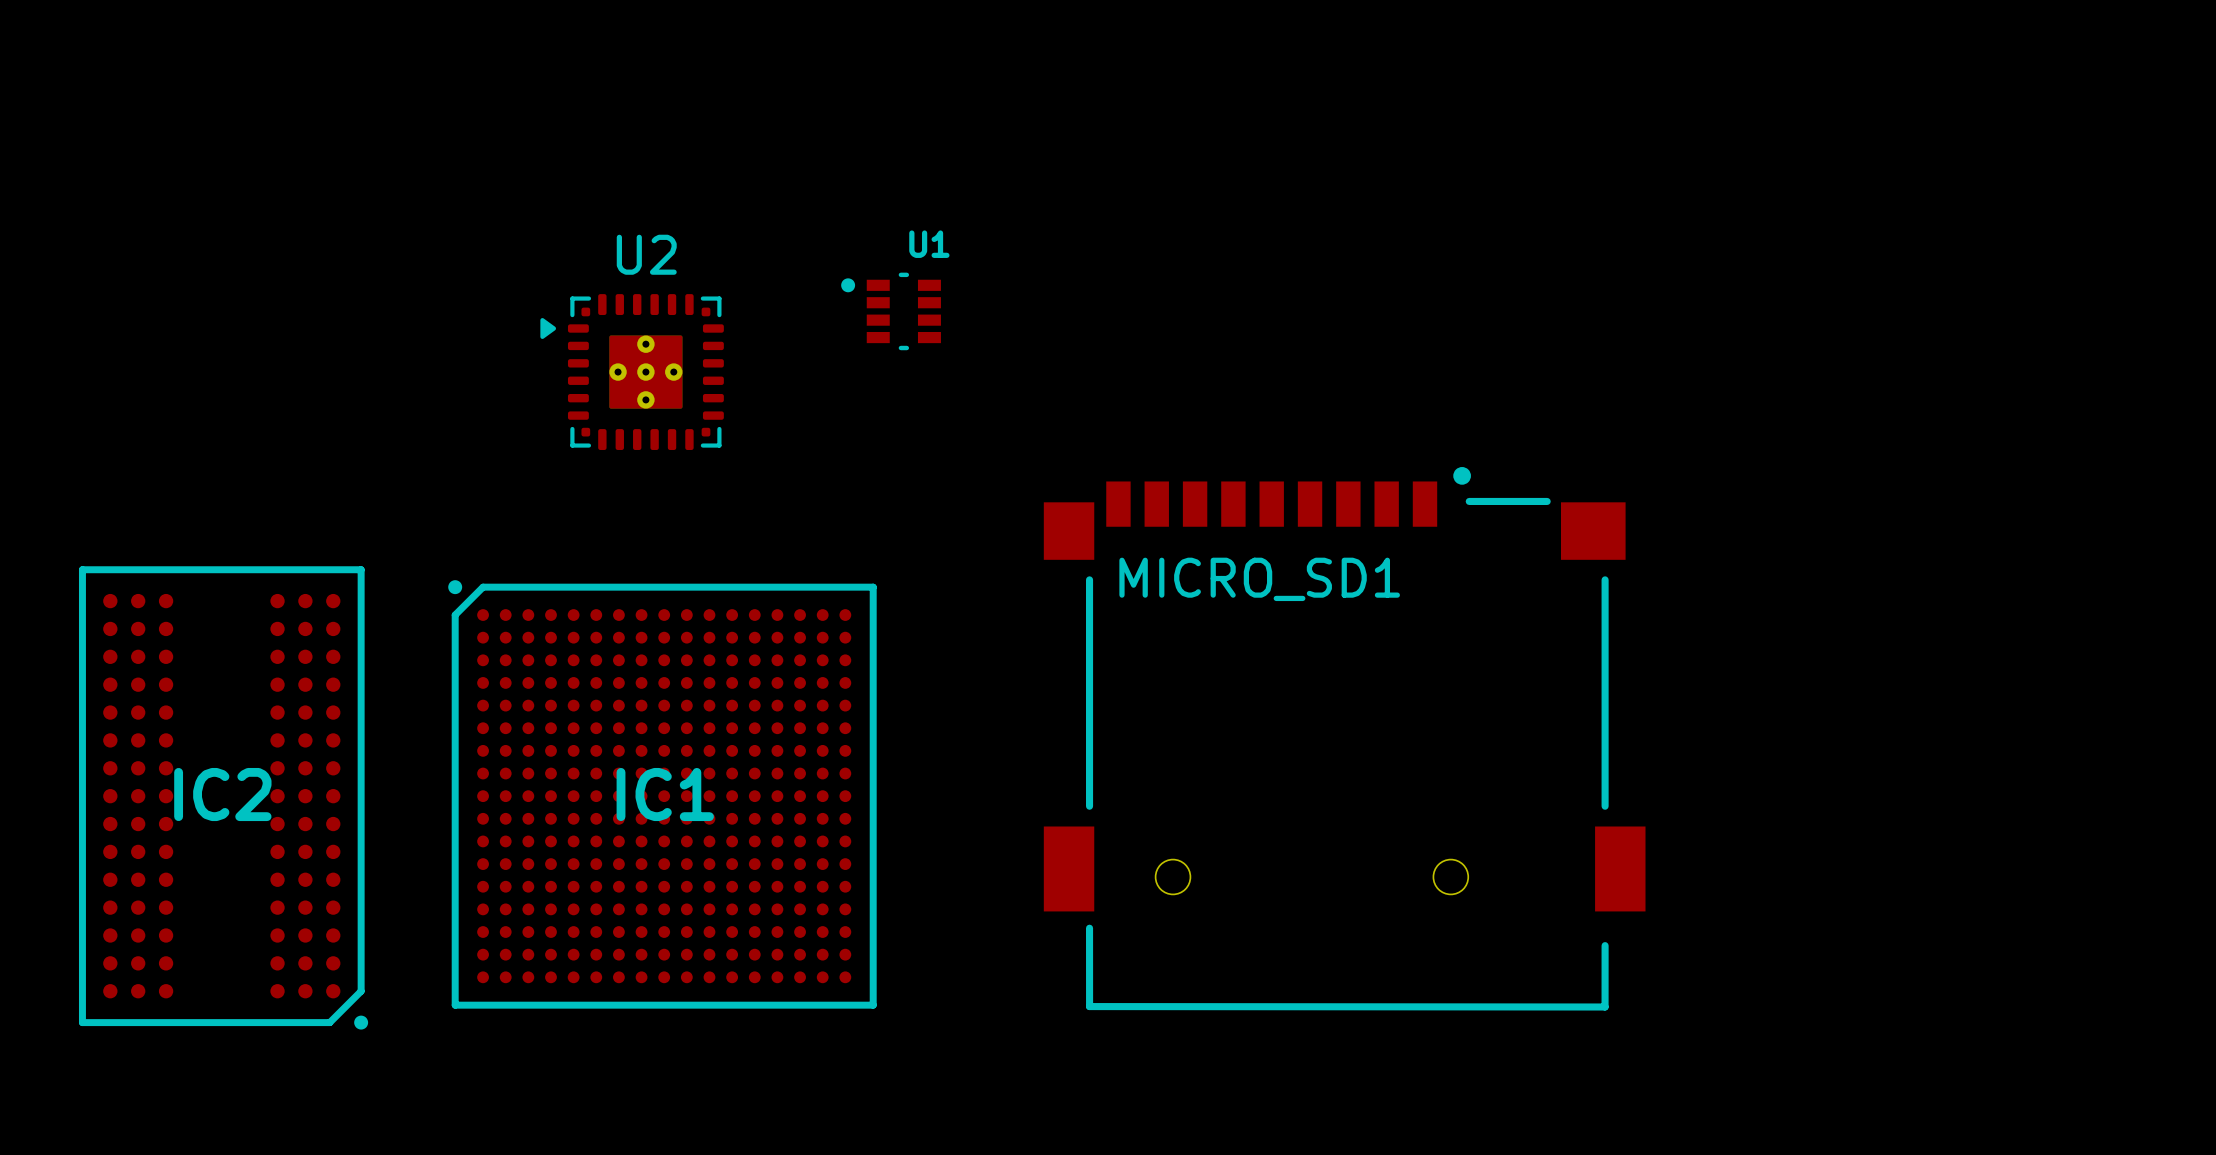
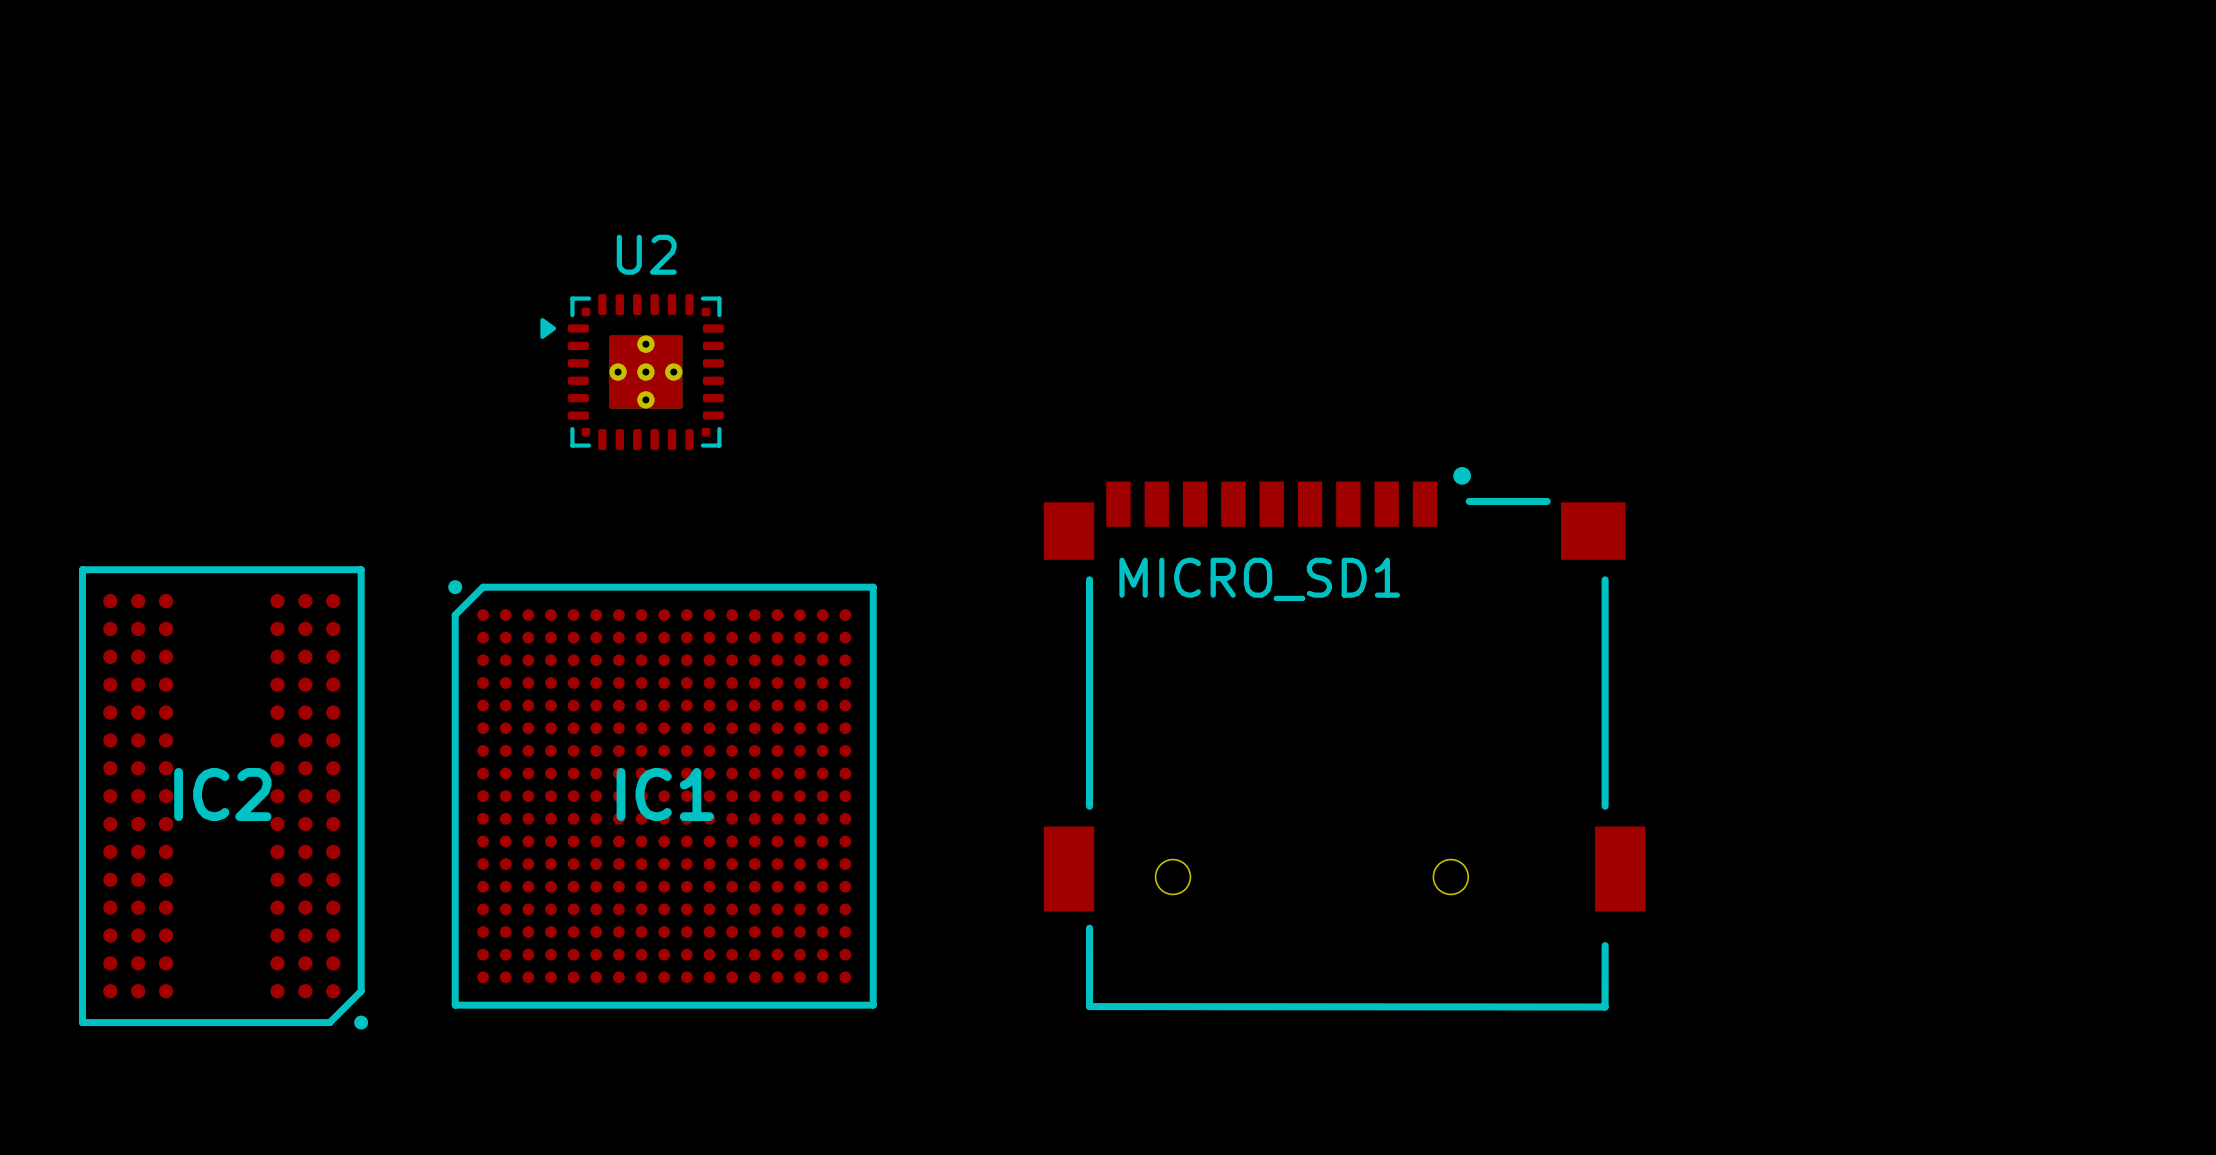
U1: (891, 311) -> none

